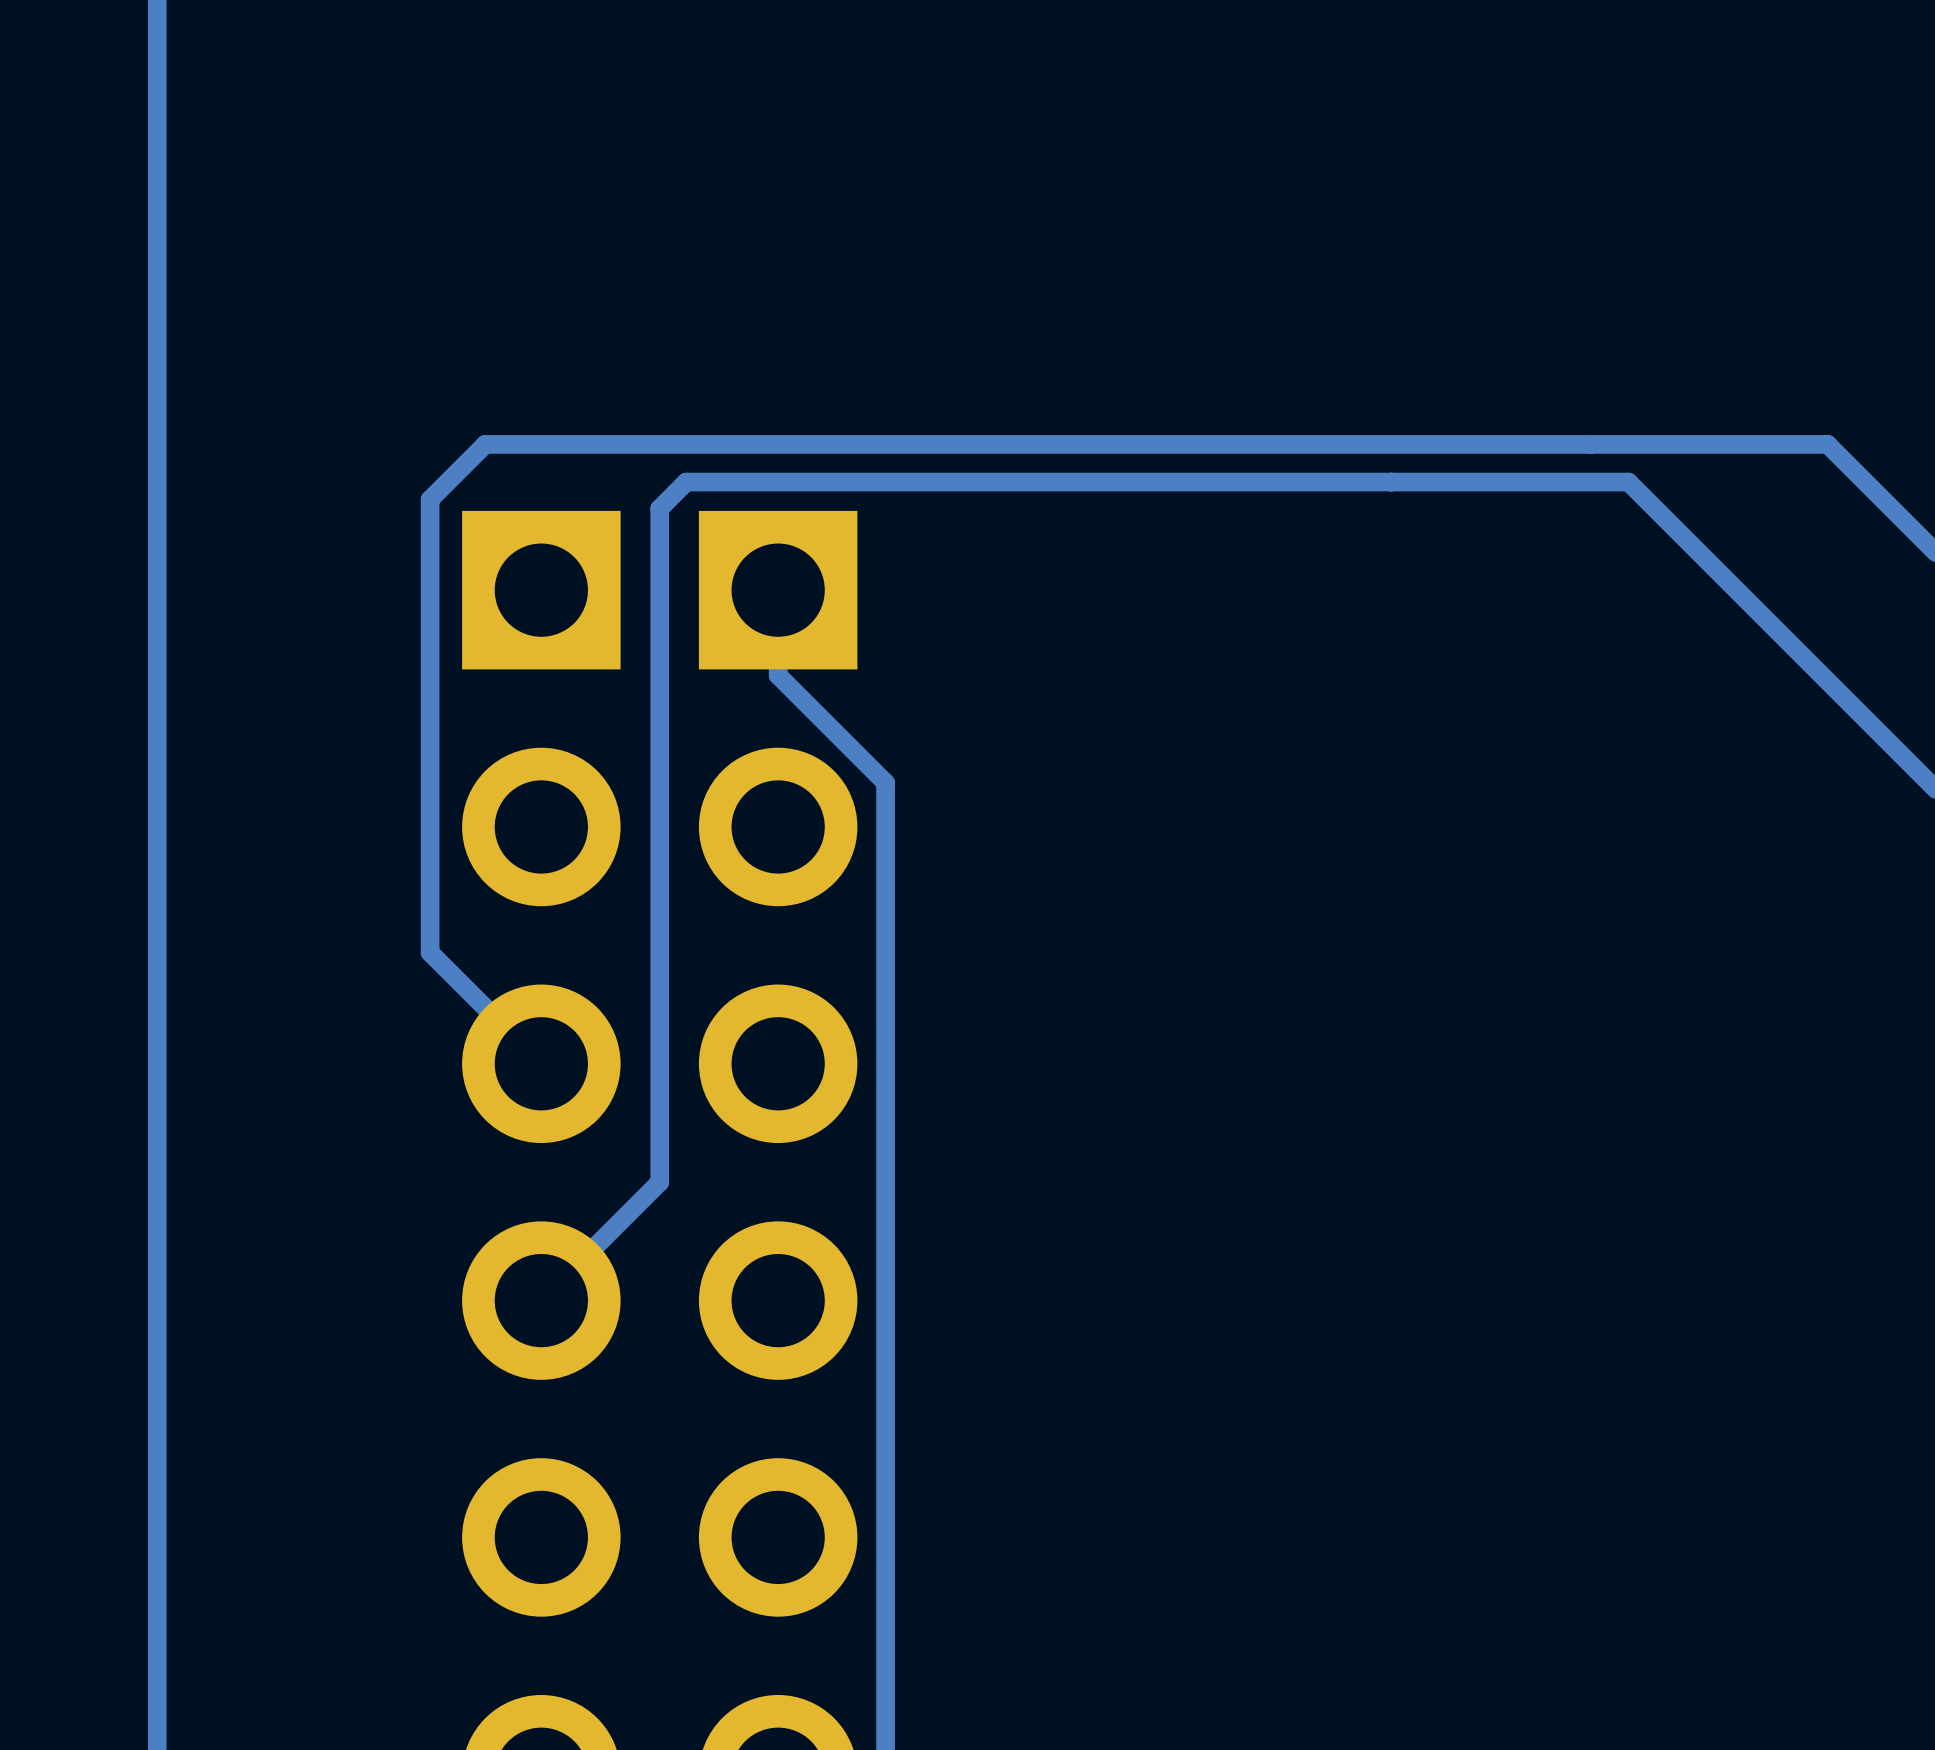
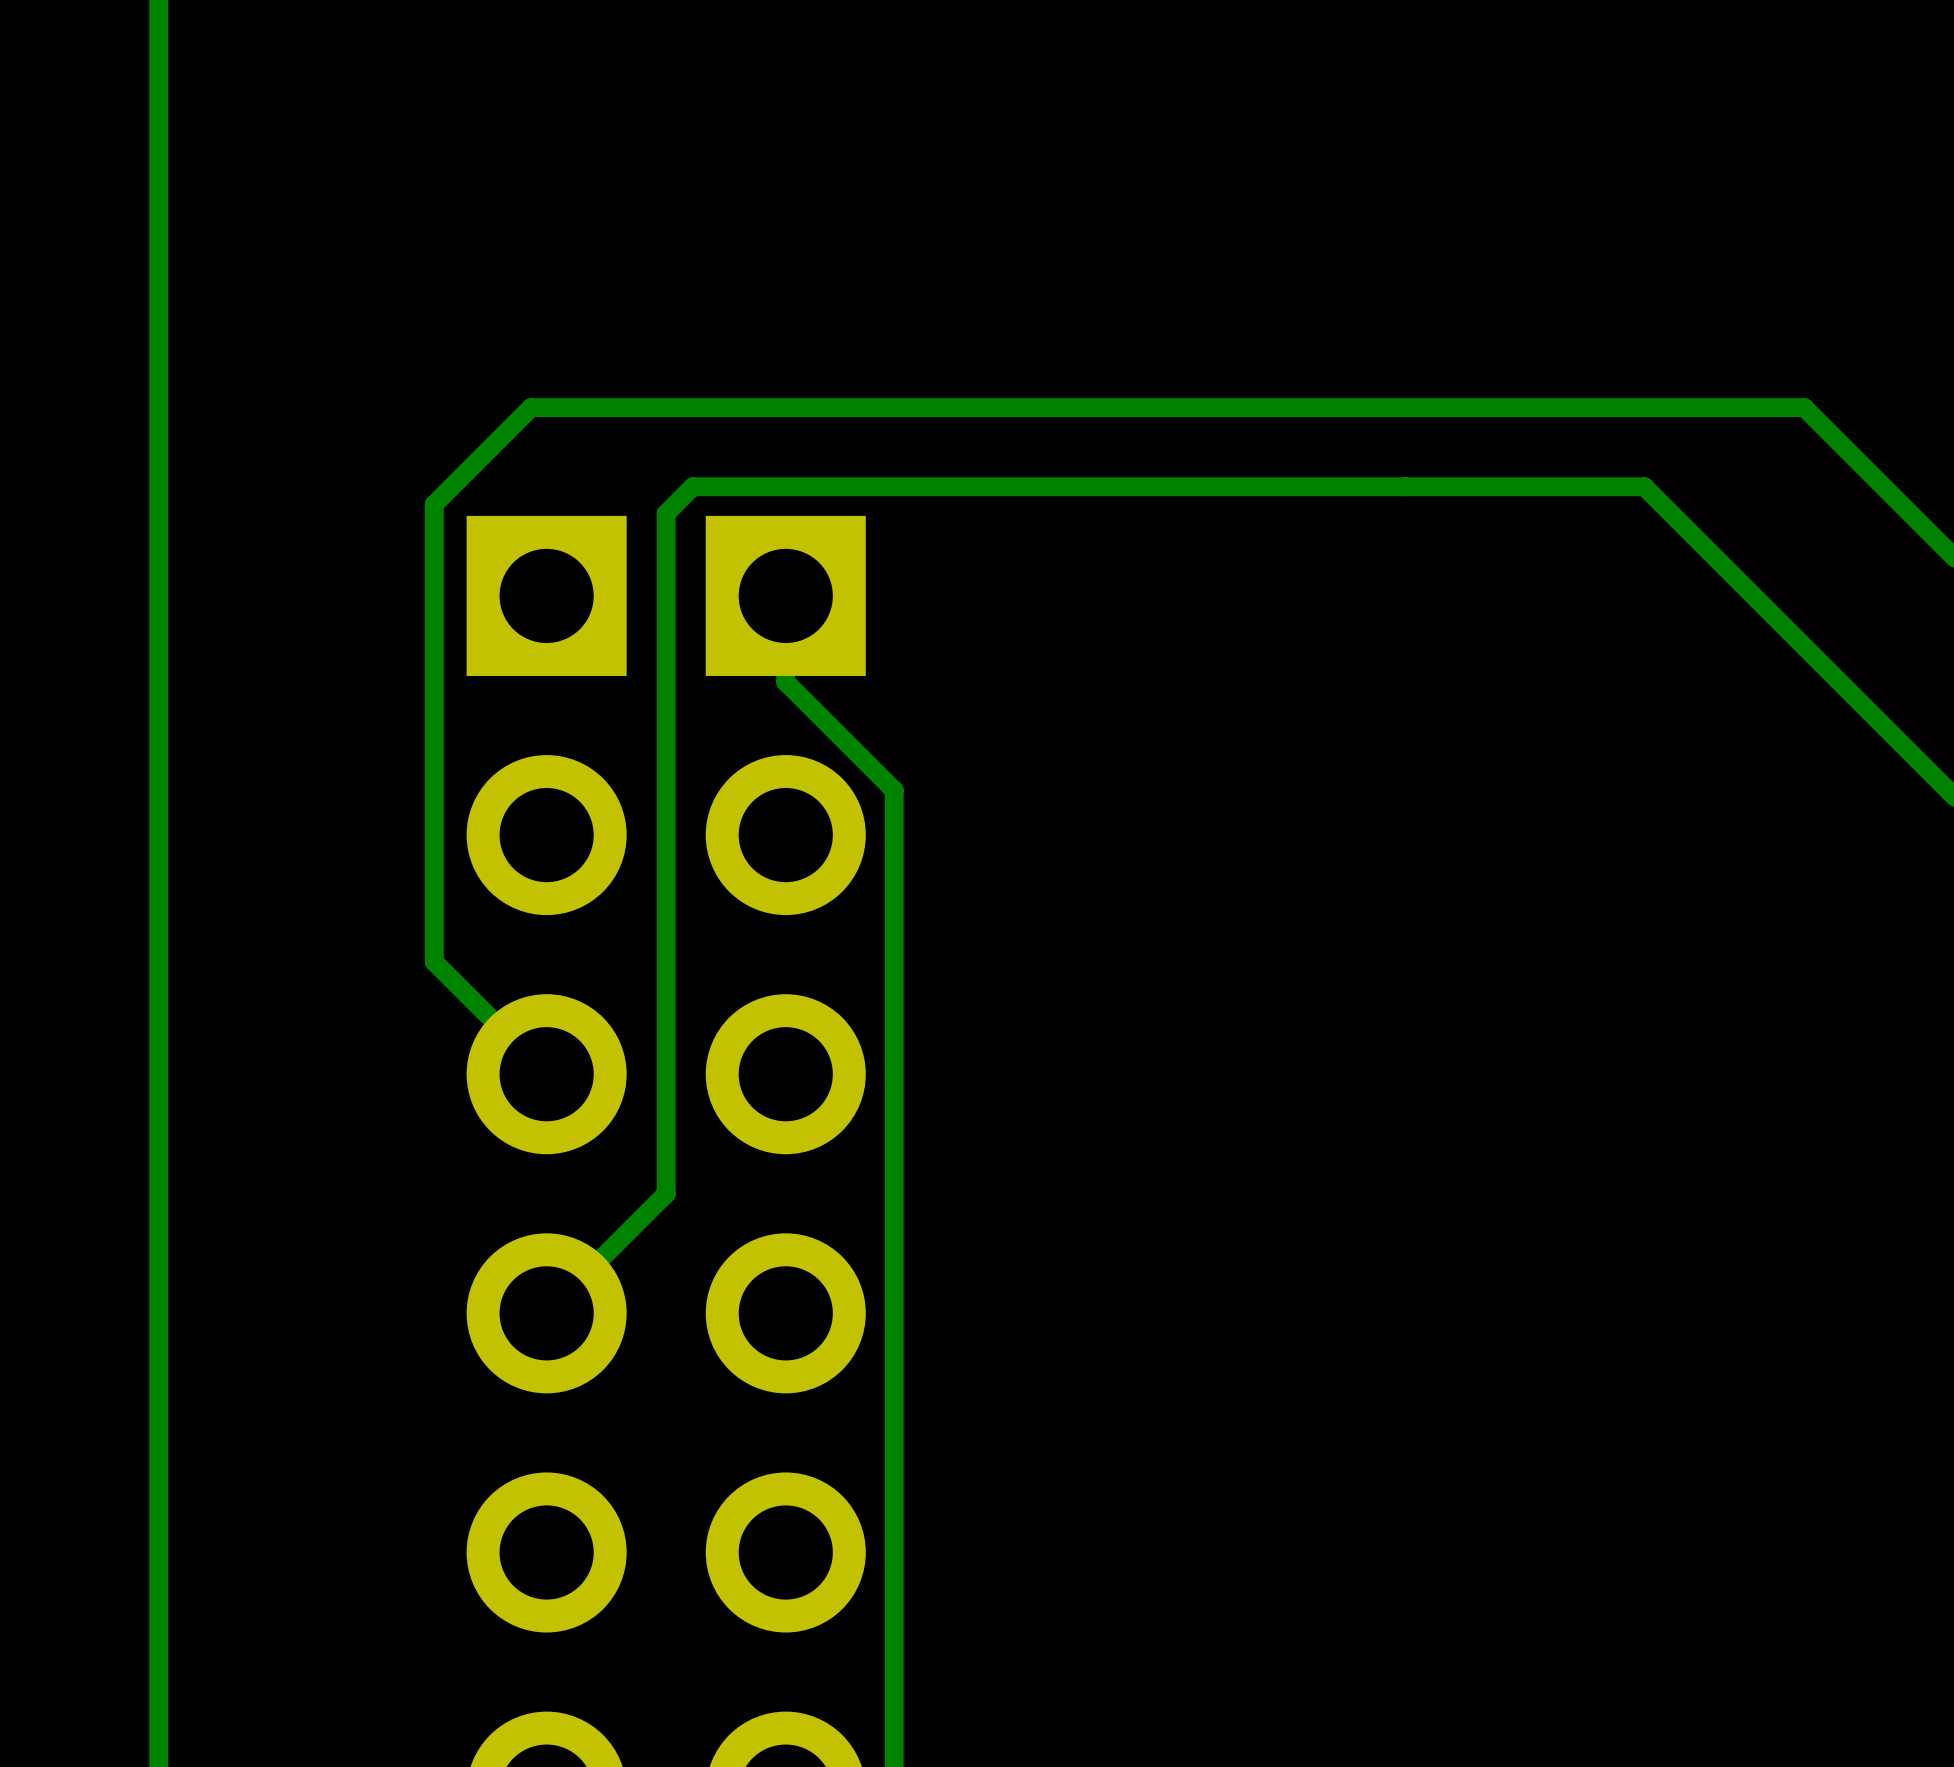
track: (1827, 444) (485, 444) (430, 499) -> (1845, 448) (1804, 407) (531, 407) (434, 504)

